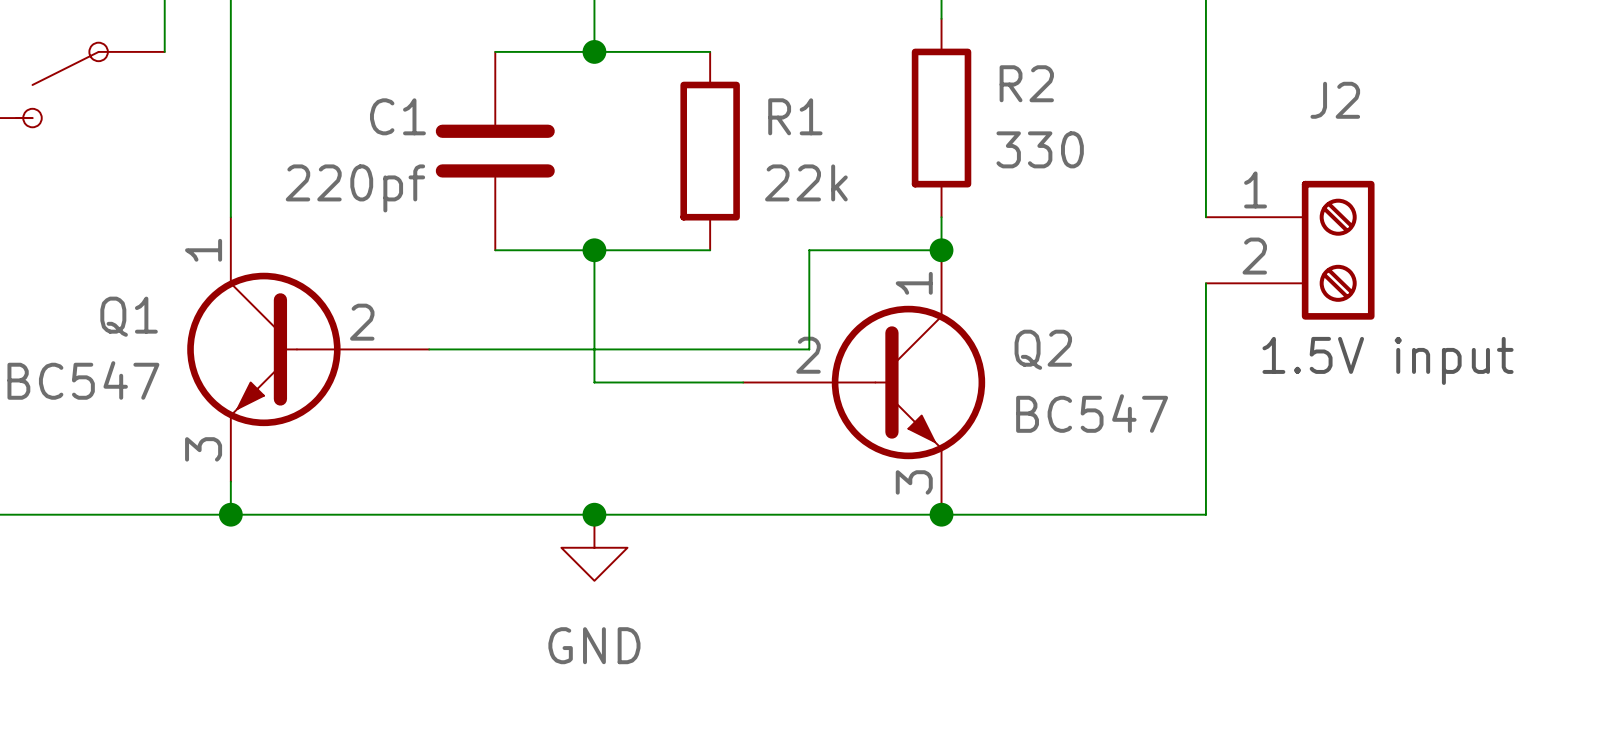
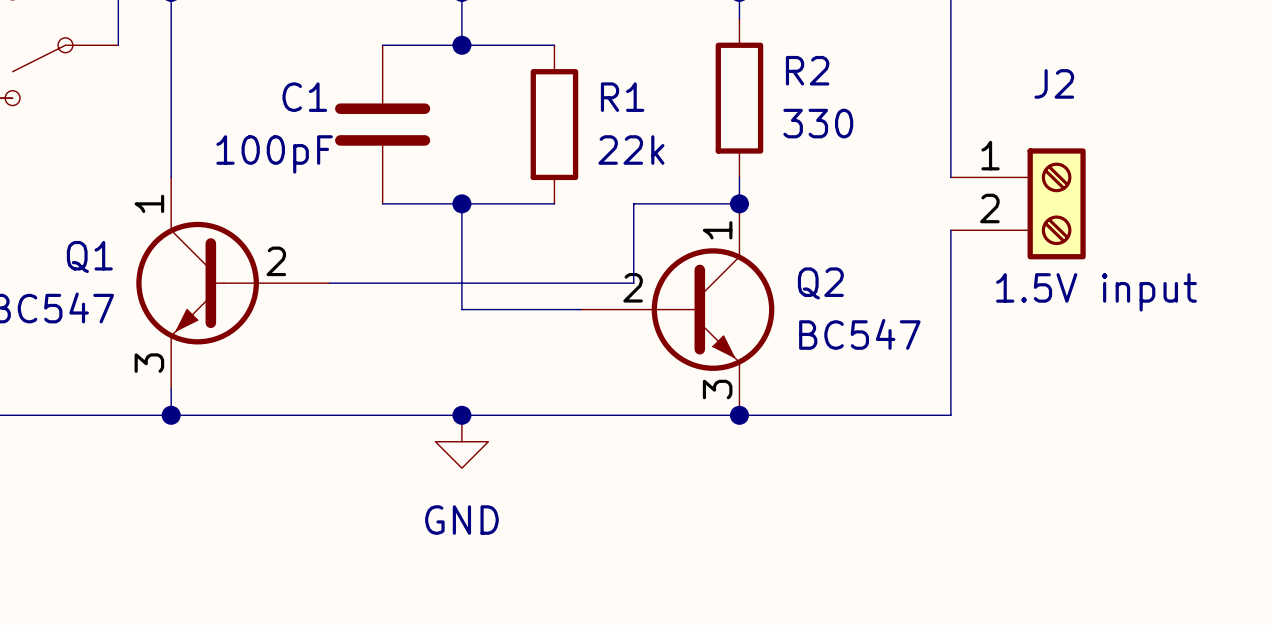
C1 value: 220pf (355, 188) -> 100pF (274, 154)

